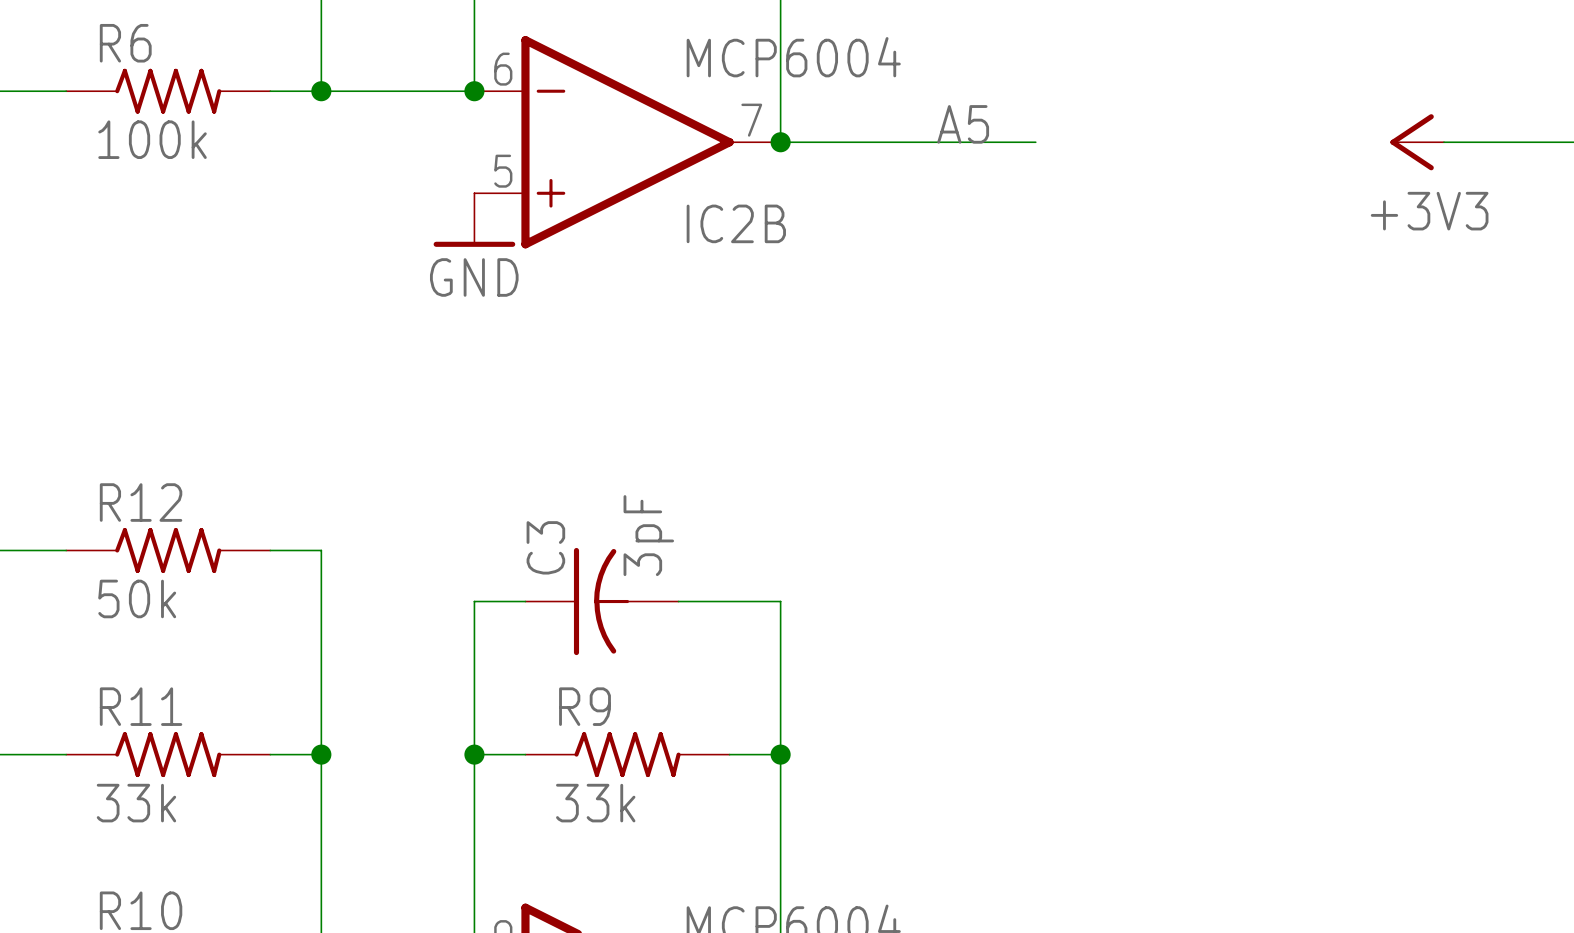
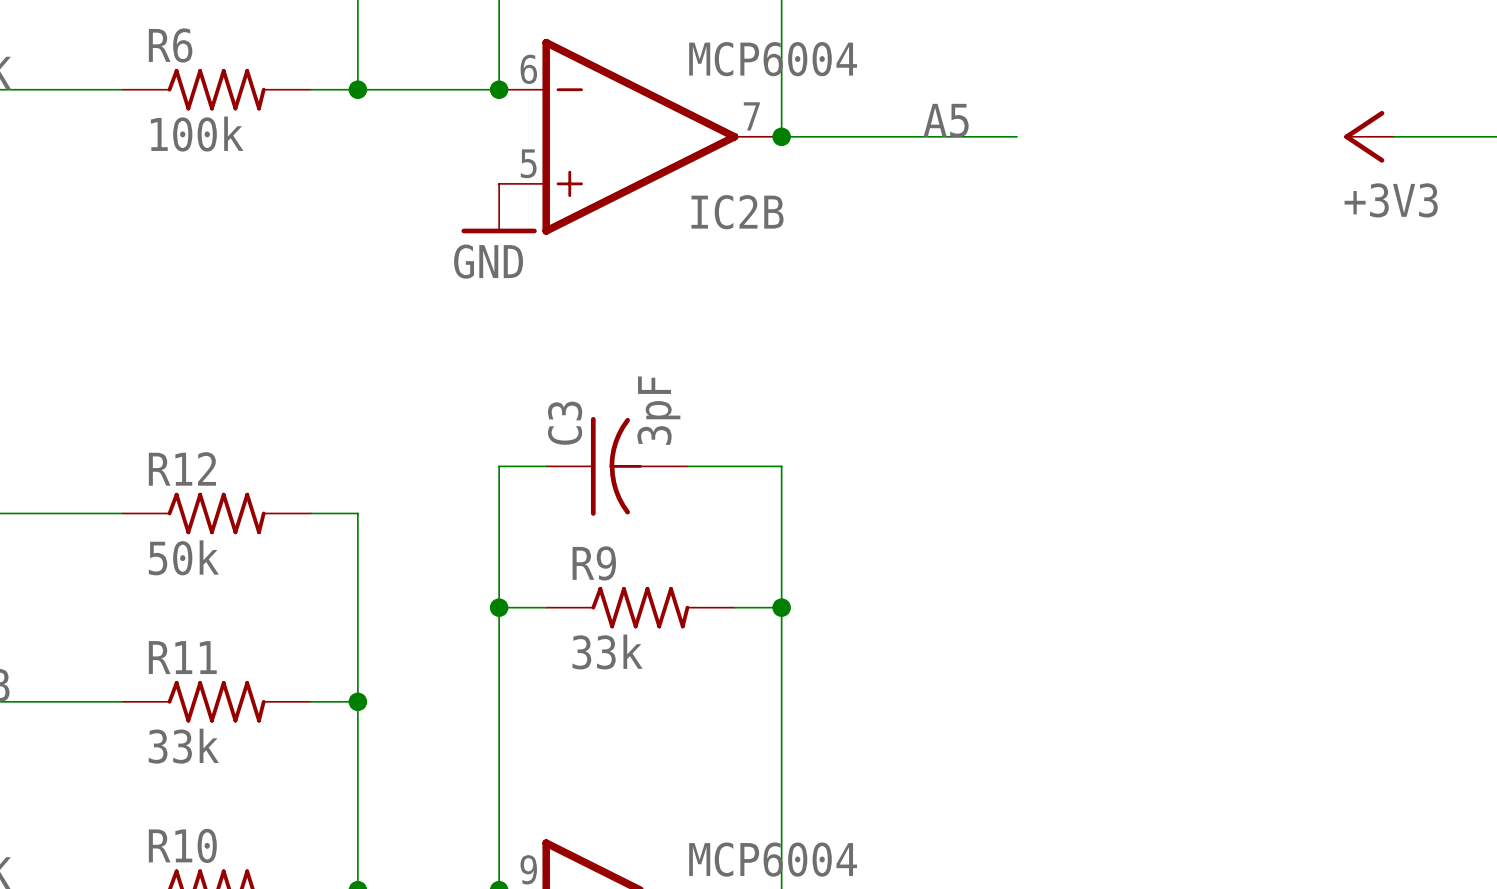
wire: (474, 601) (525, 601) -> (499, 560) (499, 466) (546, 466)
C3 position: (602, 601) -> (616, 466)
wire: (678, 601) (780, 601) -> (687, 466) (781, 466) (781, 560)
wire: (474, 754) (525, 754) -> (499, 607) (546, 607)
junction position: (474, 754) -> (499, 607)
R9 position: (627, 754) -> (640, 607)
wire: (729, 754) (780, 754) -> (734, 607) (781, 607)
junction position: (780, 754) -> (781, 607)

